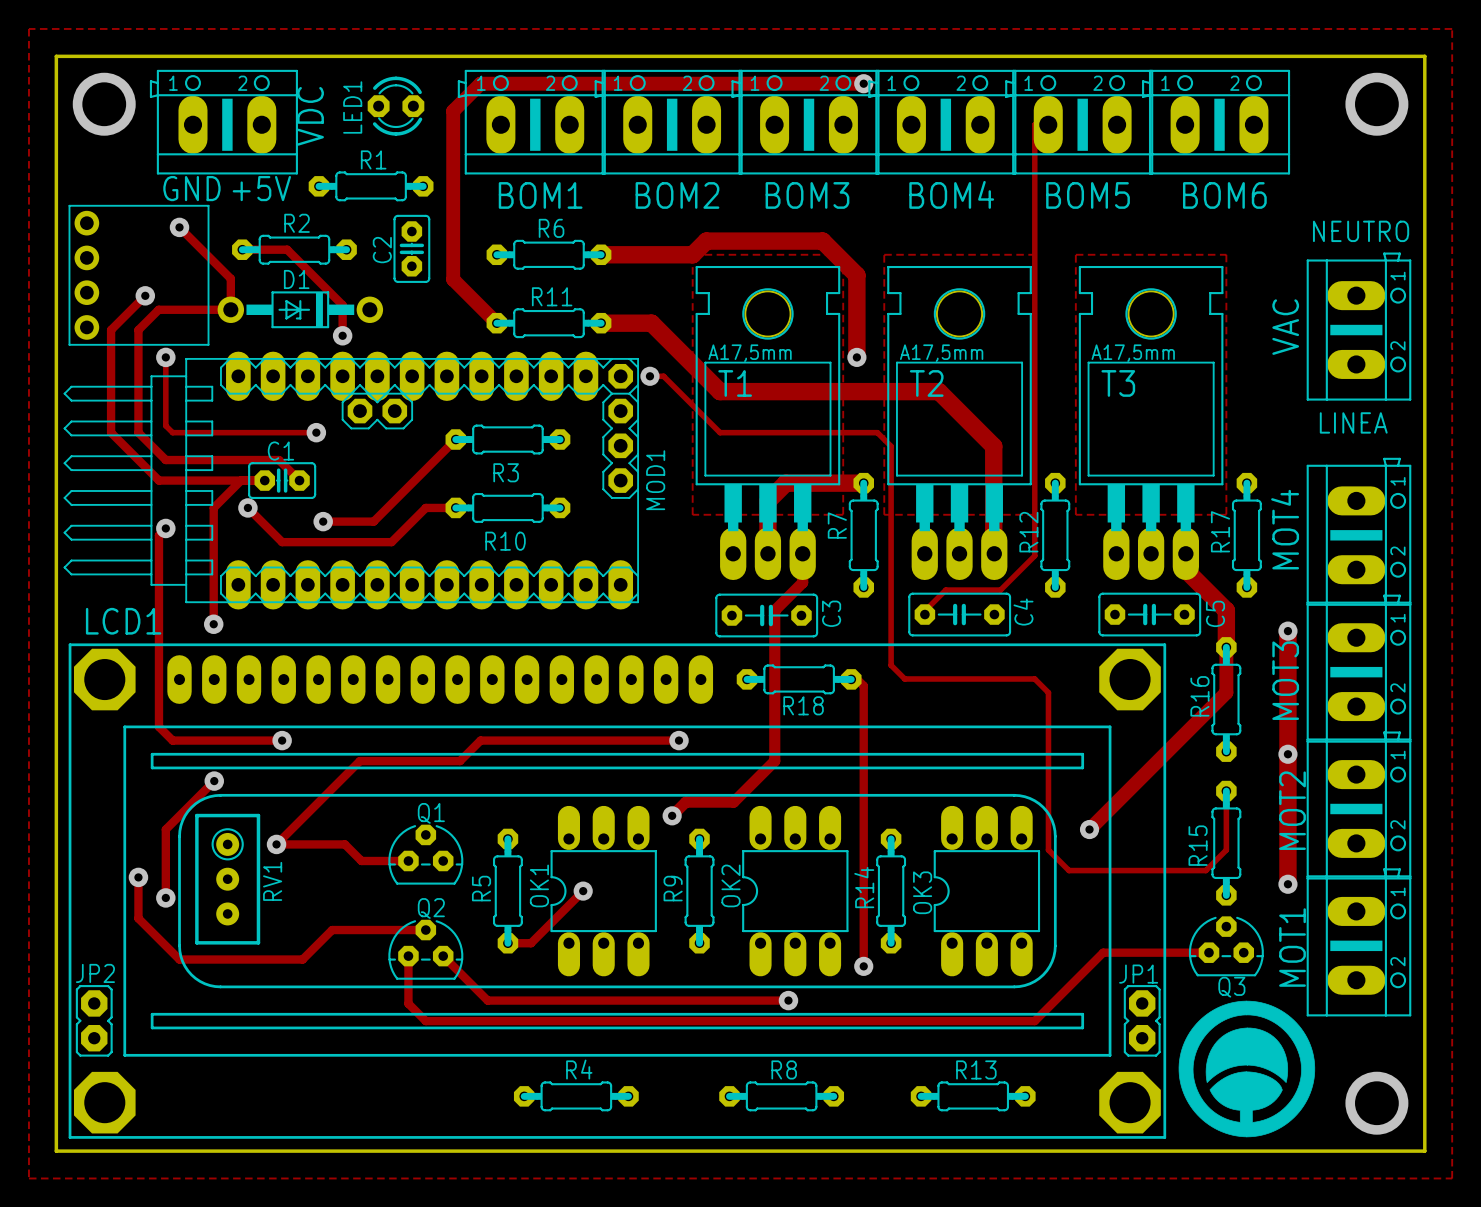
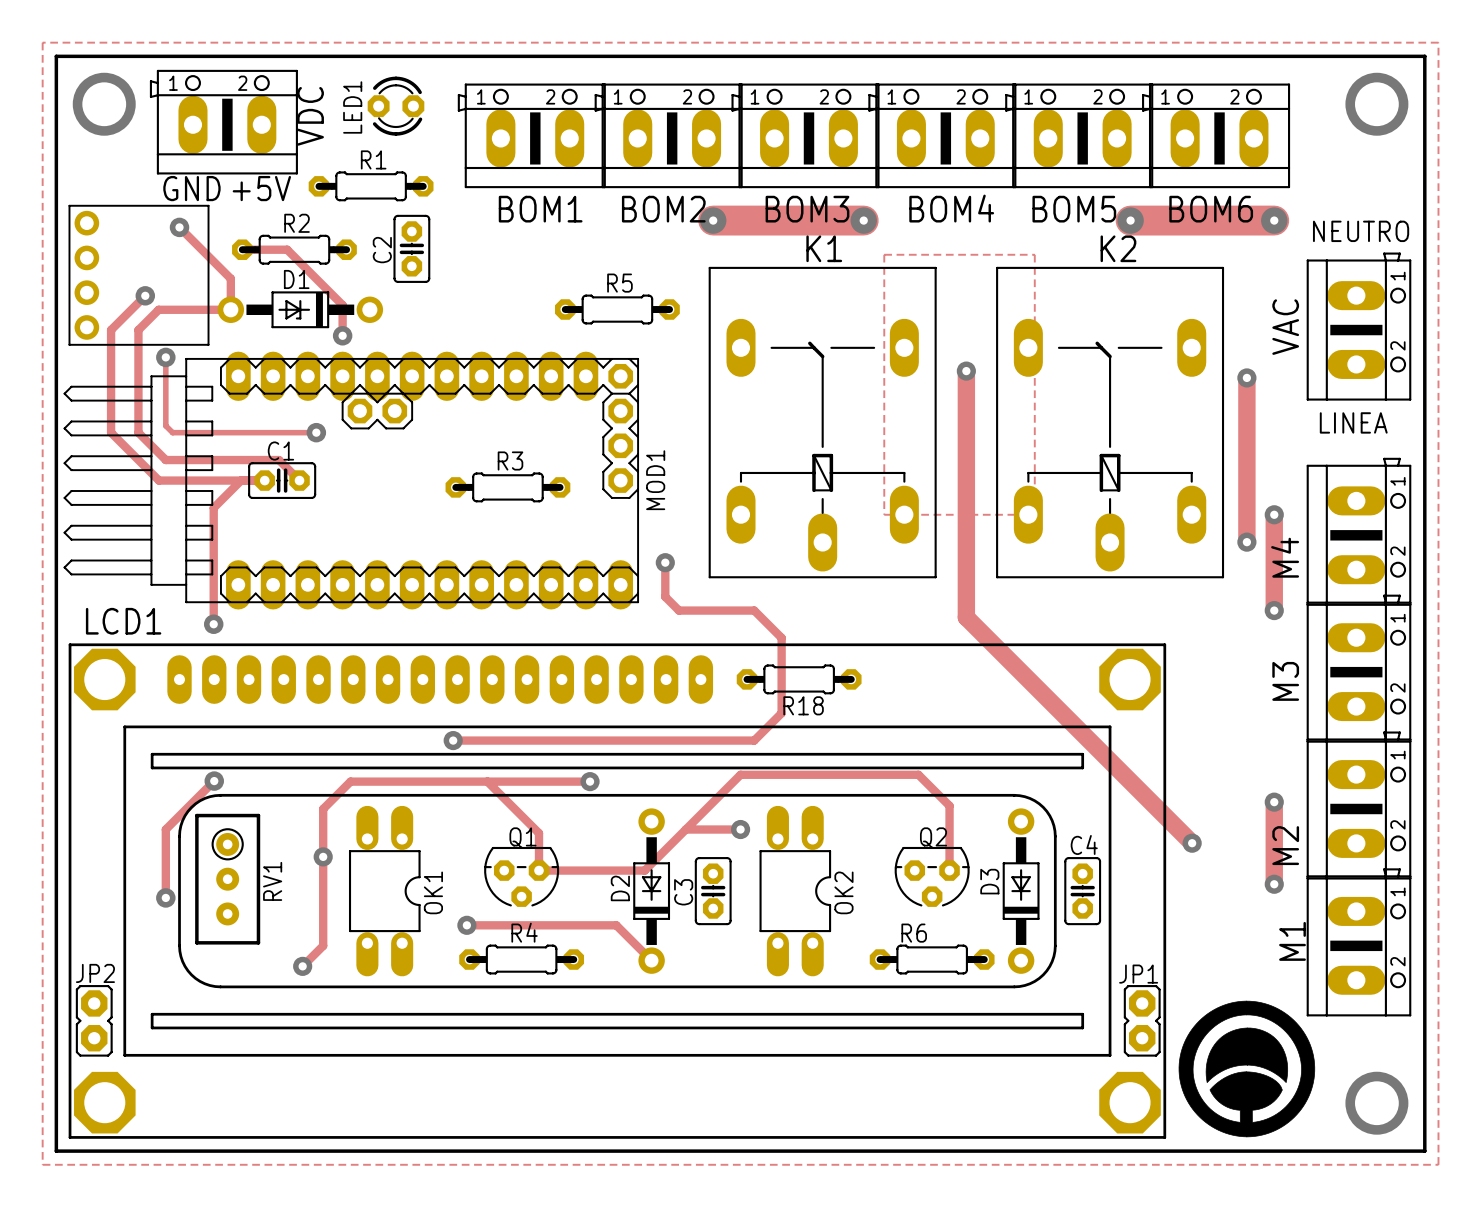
zone outline: (28, 28) (1452, 28) (1452, 1178) (28, 1178) (28, 28) -> (42, 42) (42, 1164) (1438, 1164) (1438, 42) (42, 42)
track: (863, 83) (480, 83) (453, 111) (453, 279) (496, 323) -> none
via: (863, 83) -> none
BOM1 position: (531, 122) -> (531, 135)
BOM2 position: (668, 122) -> (668, 135)
BOM3 position: (805, 122) -> (805, 135)
BOM4 position: (942, 122) -> (942, 135)
BOM5 position: (1079, 122) -> (1079, 135)
BOM6 position: (1216, 122) -> (1216, 135)
track: (1048, 124) (1034, 124) (1034, 555) (1000, 590) (945, 590) (925, 610) (924, 614) -> none
BOM2 name position: BOM2 (677, 195) -> BOM2 (663, 209)
BOM5 name position: BOM5 (1088, 195) -> BOM5 (1074, 209)
BOM6 name position: BOM6 (1224, 195) -> BOM6 (1211, 209)
track: none -> (713, 220) (863, 220)
via: none -> (713, 220)
via: none -> (863, 220)
track: none -> (1130, 220) (1274, 220)
via: none -> (1130, 220)
via: none -> (1274, 220)
R6 name position: R6 (551, 228) -> R6 (914, 933)
R6 position: (548, 254) -> (932, 959)
track: (601, 254) (692, 254) (706, 241) (822, 241) (856, 275) (856, 357) -> none
zone outline: (692, 254) (843, 254) (843, 514) (692, 514) (692, 254) -> none
zone outline: (1075, 254) (1226, 254) (1226, 514) (1075, 514) (1075, 254) -> none
R11: (548, 323) -> none
track: (601, 323) (651, 323) (720, 391) (939, 391) (993, 446) (994, 553) -> none
via: (856, 357) -> none
track: none -> (966, 371) (966, 617) (1192, 843)
via: none -> (966, 371)
track: (649, 376) (663, 376) (720, 432) (877, 432) (891, 446) (891, 665) (904, 678) (1034, 678) (1048, 692) (1048, 850) (1069, 870) (1205, 870) (1226, 850) (1226, 791) -> none
via: (649, 376) -> none
track: none -> (1246, 377) (1246, 542)
via: none -> (1246, 377)
K1: none -> (822, 422)
K2: none -> (1110, 422)
T1: (767, 423) -> none
T2: (959, 423) -> none
T3: (1151, 423) -> none
track: (455, 439) (373, 521) (323, 521) -> none
R3 position: (507, 439) -> (507, 487)
R3 name position: R3 (506, 472) -> R3 (510, 460)
track: (863, 483) (785, 483) (767, 501) (767, 553) -> none
track: (247, 507) (282, 542) (391, 542) (425, 507) (455, 507) -> none
via: (247, 507) -> none
R10: (507, 507) -> none
track: none -> (1274, 514) (1274, 610)
via: none -> (1274, 514)
via: (323, 521) -> none
track: (165, 528) (158, 535) (158, 726) (172, 740) (282, 740) -> none
via: (165, 528) -> none
MOT4 name: MOT4 (1285, 529) -> M4 (1285, 557)
R7: (863, 535) -> none
R12: (1055, 535) -> none
R17: (1246, 535) -> none
via: none -> (1246, 542)
track: (802, 553) (802, 582) (774, 610) (774, 761) (733, 802) (685, 802) (672, 815) -> none
track: (1185, 553) (1185, 570) (1226, 610) (1226, 692) (1089, 829) -> none
track: none -> (665, 562) (665, 596) (678, 610) (754, 610) (781, 637) (781, 713) (754, 740) (678, 740)
via: none -> (665, 562)
C4 footprint: [908, 592, 1012, 637] -> [1064, 857, 1102, 926]
C3 footprint: [715, 593, 819, 638] -> [694, 857, 732, 926]
C4 name position: C4 (1023, 612) -> C4 (1084, 844)
C3 name position: C3 (831, 613) -> C3 (683, 892)
C5: (1149, 614) -> none
track: (1287, 631) (1287, 884) -> none
via position: (1287, 631) -> (1274, 610)
track: (851, 679) (857, 679) (863, 685) (863, 966) -> none
MOT3 name: MOT3 (1285, 680) -> M3 (1285, 681)
R16: (1226, 699) -> none
via: (282, 740) -> none
via: none -> (453, 740)
track: (480, 740) (460, 761) (359, 761) (276, 844) (344, 844) (361, 860) (408, 860) -> (480, 740) (453, 740)
via: (678, 740) -> none
via: (1287, 754) -> none
track: none -> (487, 781) (539, 833) (539, 870) (644, 870) (740, 774) (918, 774) (949, 805) (949, 870)
track: none -> (590, 781) (350, 781) (323, 808) (323, 945) (302, 966)
via: none -> (590, 781)
track: none -> (1274, 802) (1274, 884)
via: none -> (1274, 802)
OK1 footprint: [550, 805, 657, 977] -> [348, 805, 421, 977]
OK2 footprint: [742, 805, 849, 977] -> [759, 805, 832, 977]
MOT2 name: MOT2 (1292, 810) -> M2 (1285, 845)
via: (672, 815) -> none
track: none -> (685, 829) (740, 829)
via: none -> (740, 829)
via: (1089, 829) -> none
via: none -> (1192, 843)
R15: (1226, 843) -> none
via: (276, 844) -> none
Q1 rotation: 0° (425, 854) -> 180° (521, 876)
Q1 position: (425, 854) -> (521, 876)
via: none -> (323, 856)
track: (138, 877) (138, 918) (179, 959) (302, 959) (332, 930) (425, 930) -> none
via: (138, 877) -> none
via position: (1287, 884) -> (1274, 884)
OK1 name position: OK1 (539, 885) -> OK1 (433, 892)
OK2 name position: OK2 (731, 885) -> OK2 (843, 892)
R5 rotation: 0° (507, 891) -> 90° clockwise (617, 309)
R5 position: (507, 891) -> (617, 309)
track: (583, 891) (531, 943) (507, 943) -> none
via: (583, 891) -> none
D2: none -> (651, 891)
R9: (699, 891) -> none
R14: (891, 891) -> none
OK3: (986, 891) -> none
D3: none -> (1021, 891)
track: none -> (466, 925) (616, 925) (651, 960)
via: none -> (466, 925)
Q3: (1226, 946) -> none
MOT1 name: MOT1 (1292, 947) -> M1 (1292, 941)
Q2 rotation: 0° (425, 949) -> 180° (932, 876)
Q2 position: (425, 949) -> (932, 876)
track: (1208, 952) (1103, 952) (1034, 1021) (425, 1021) (408, 1003) (408, 956) -> none
track: (443, 956) (487, 1000) (788, 1000) -> none
via: none -> (302, 966)
via: (863, 966) -> none
via: (788, 1000) -> none
R4 position: (576, 1096) -> (521, 959)
R8: (781, 1096) -> none
R13: (973, 1096) -> none

